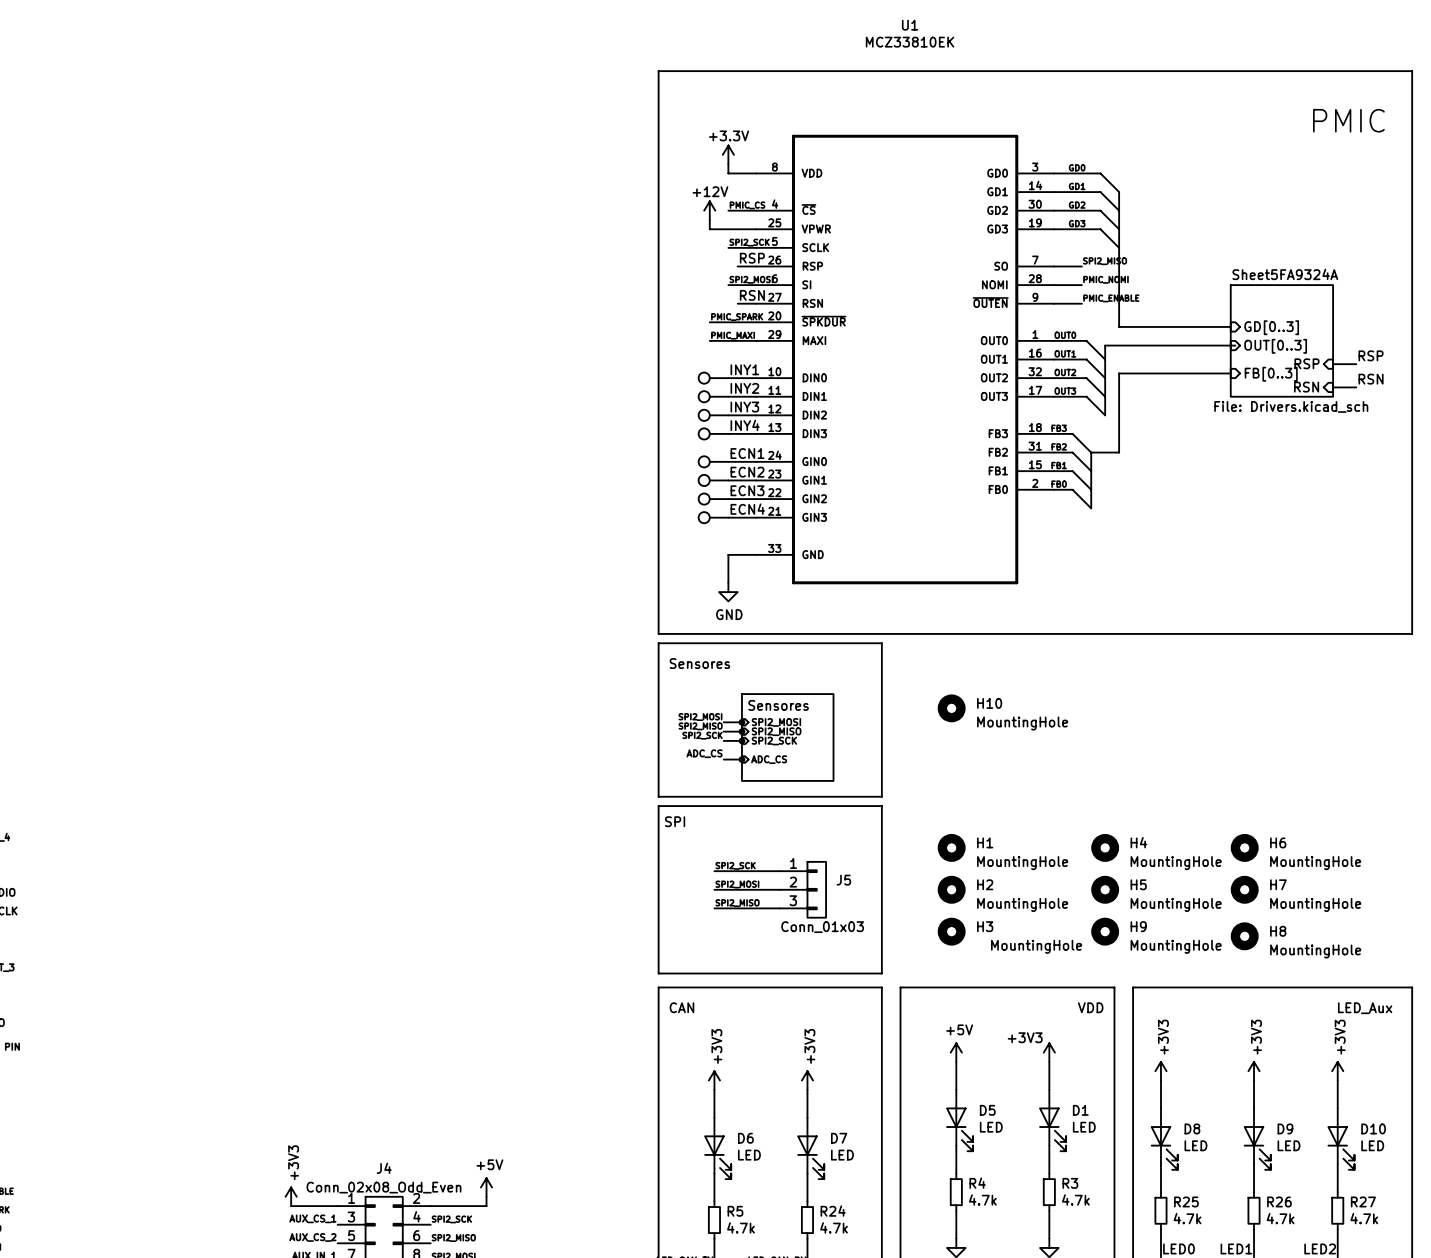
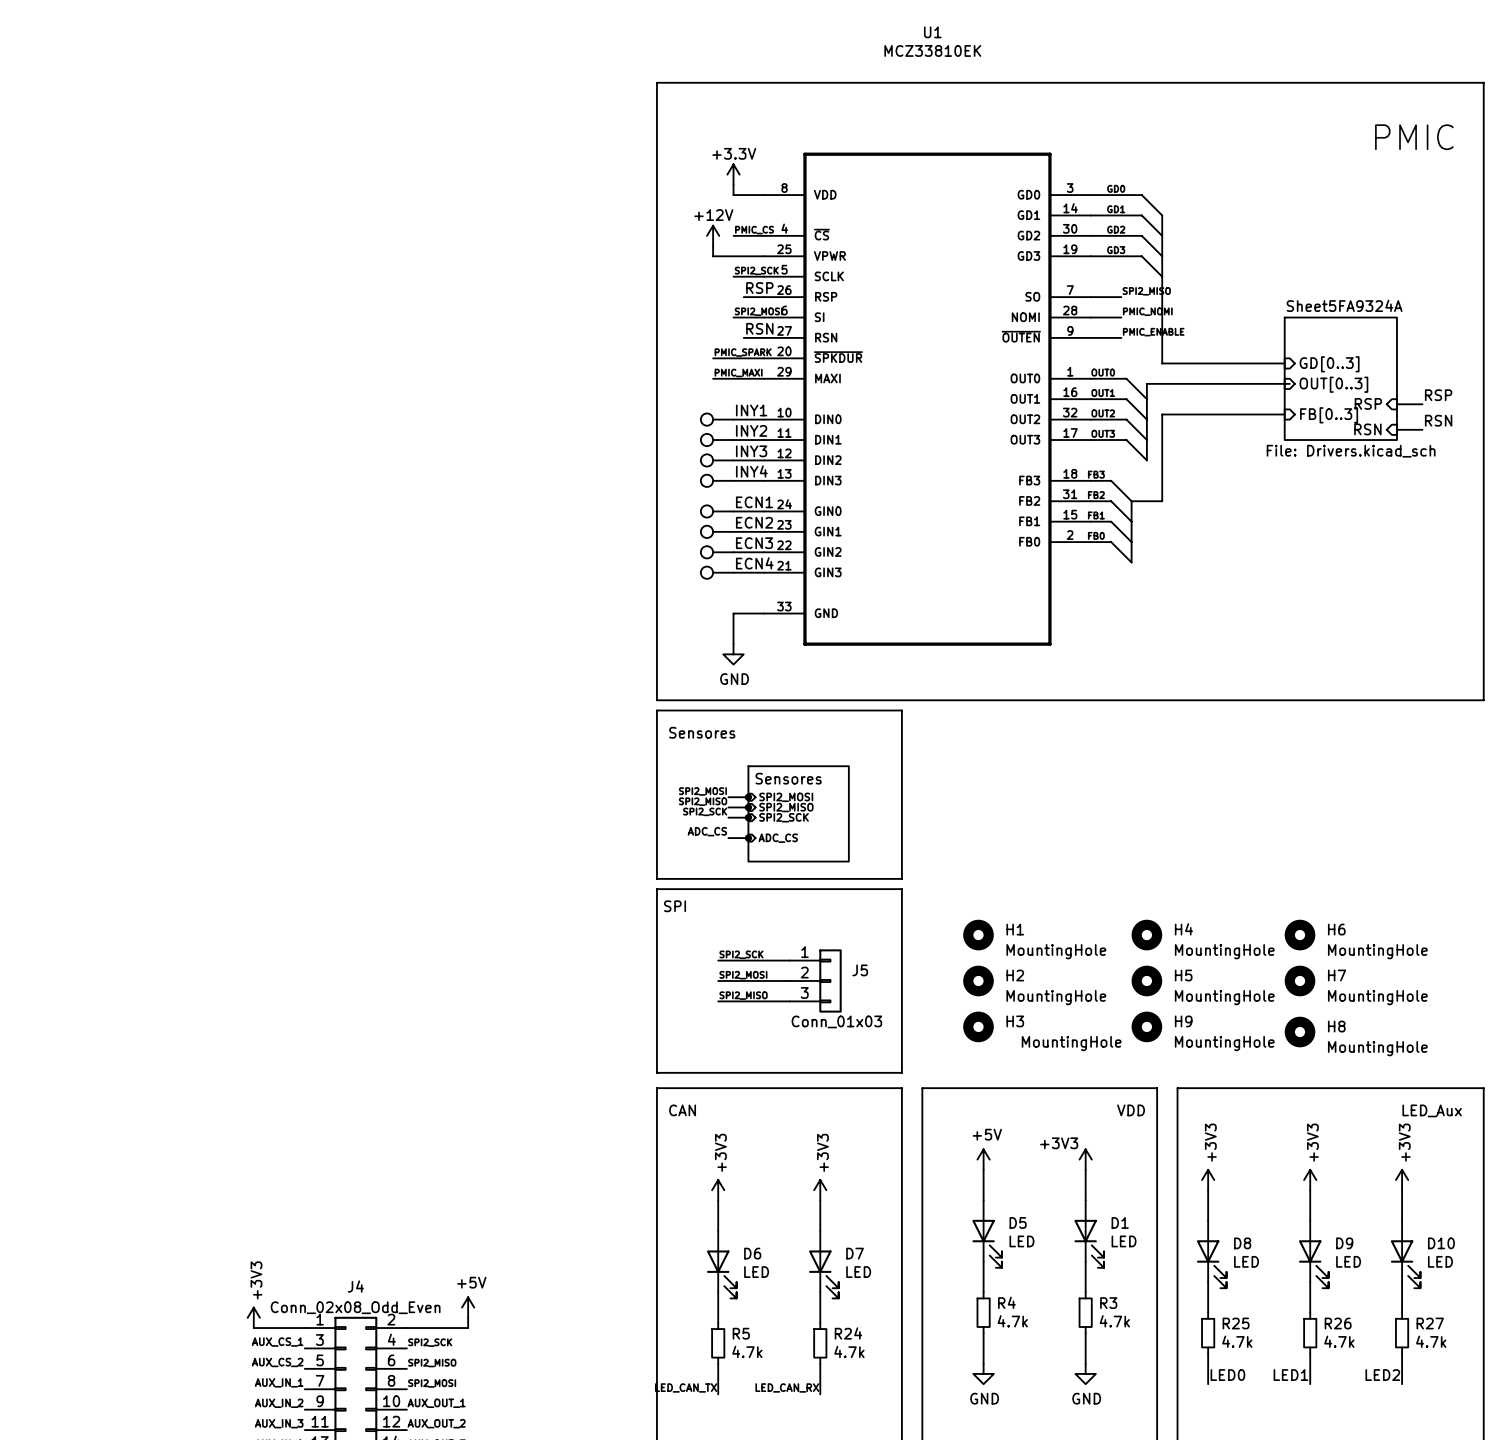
H10: MountingHole (951, 708) -> none

